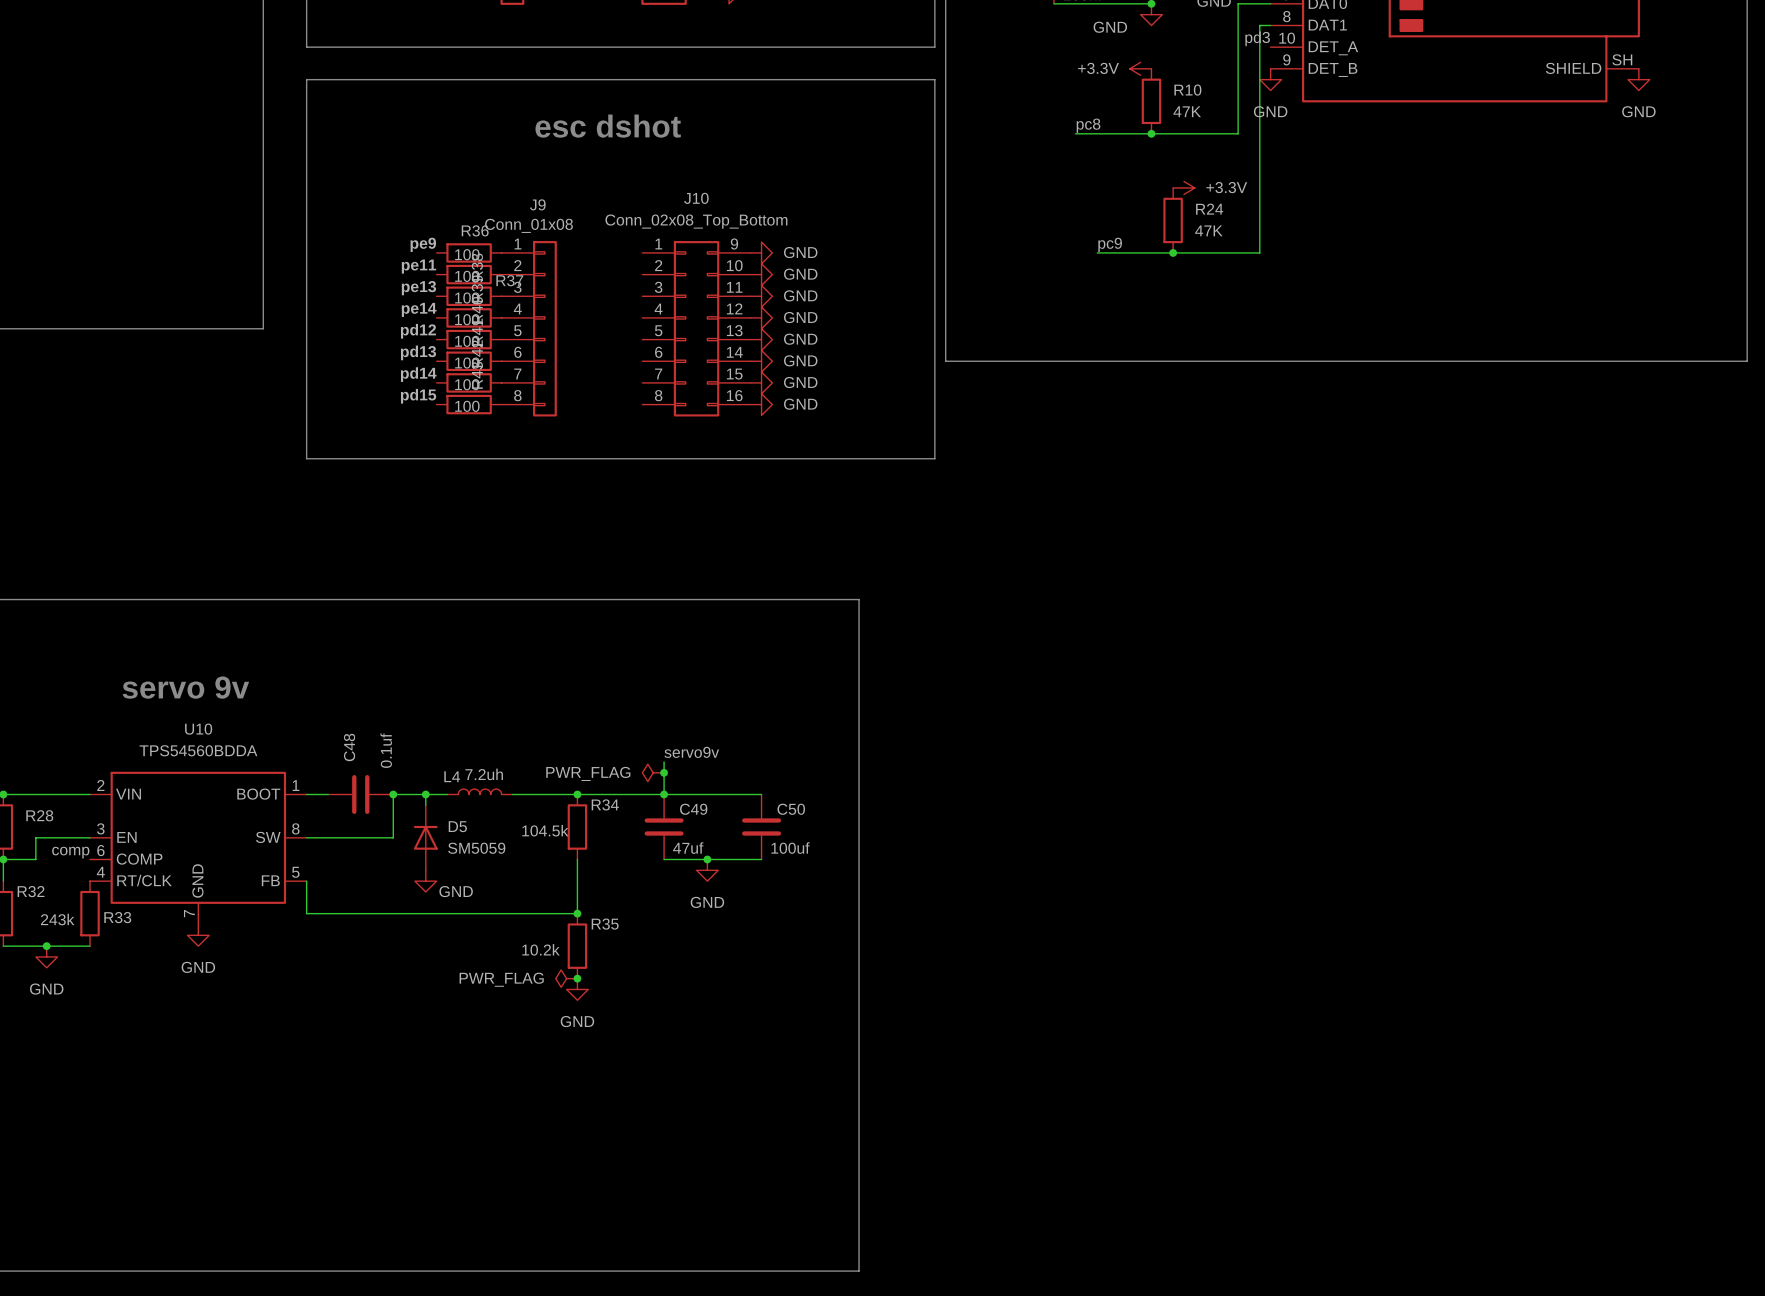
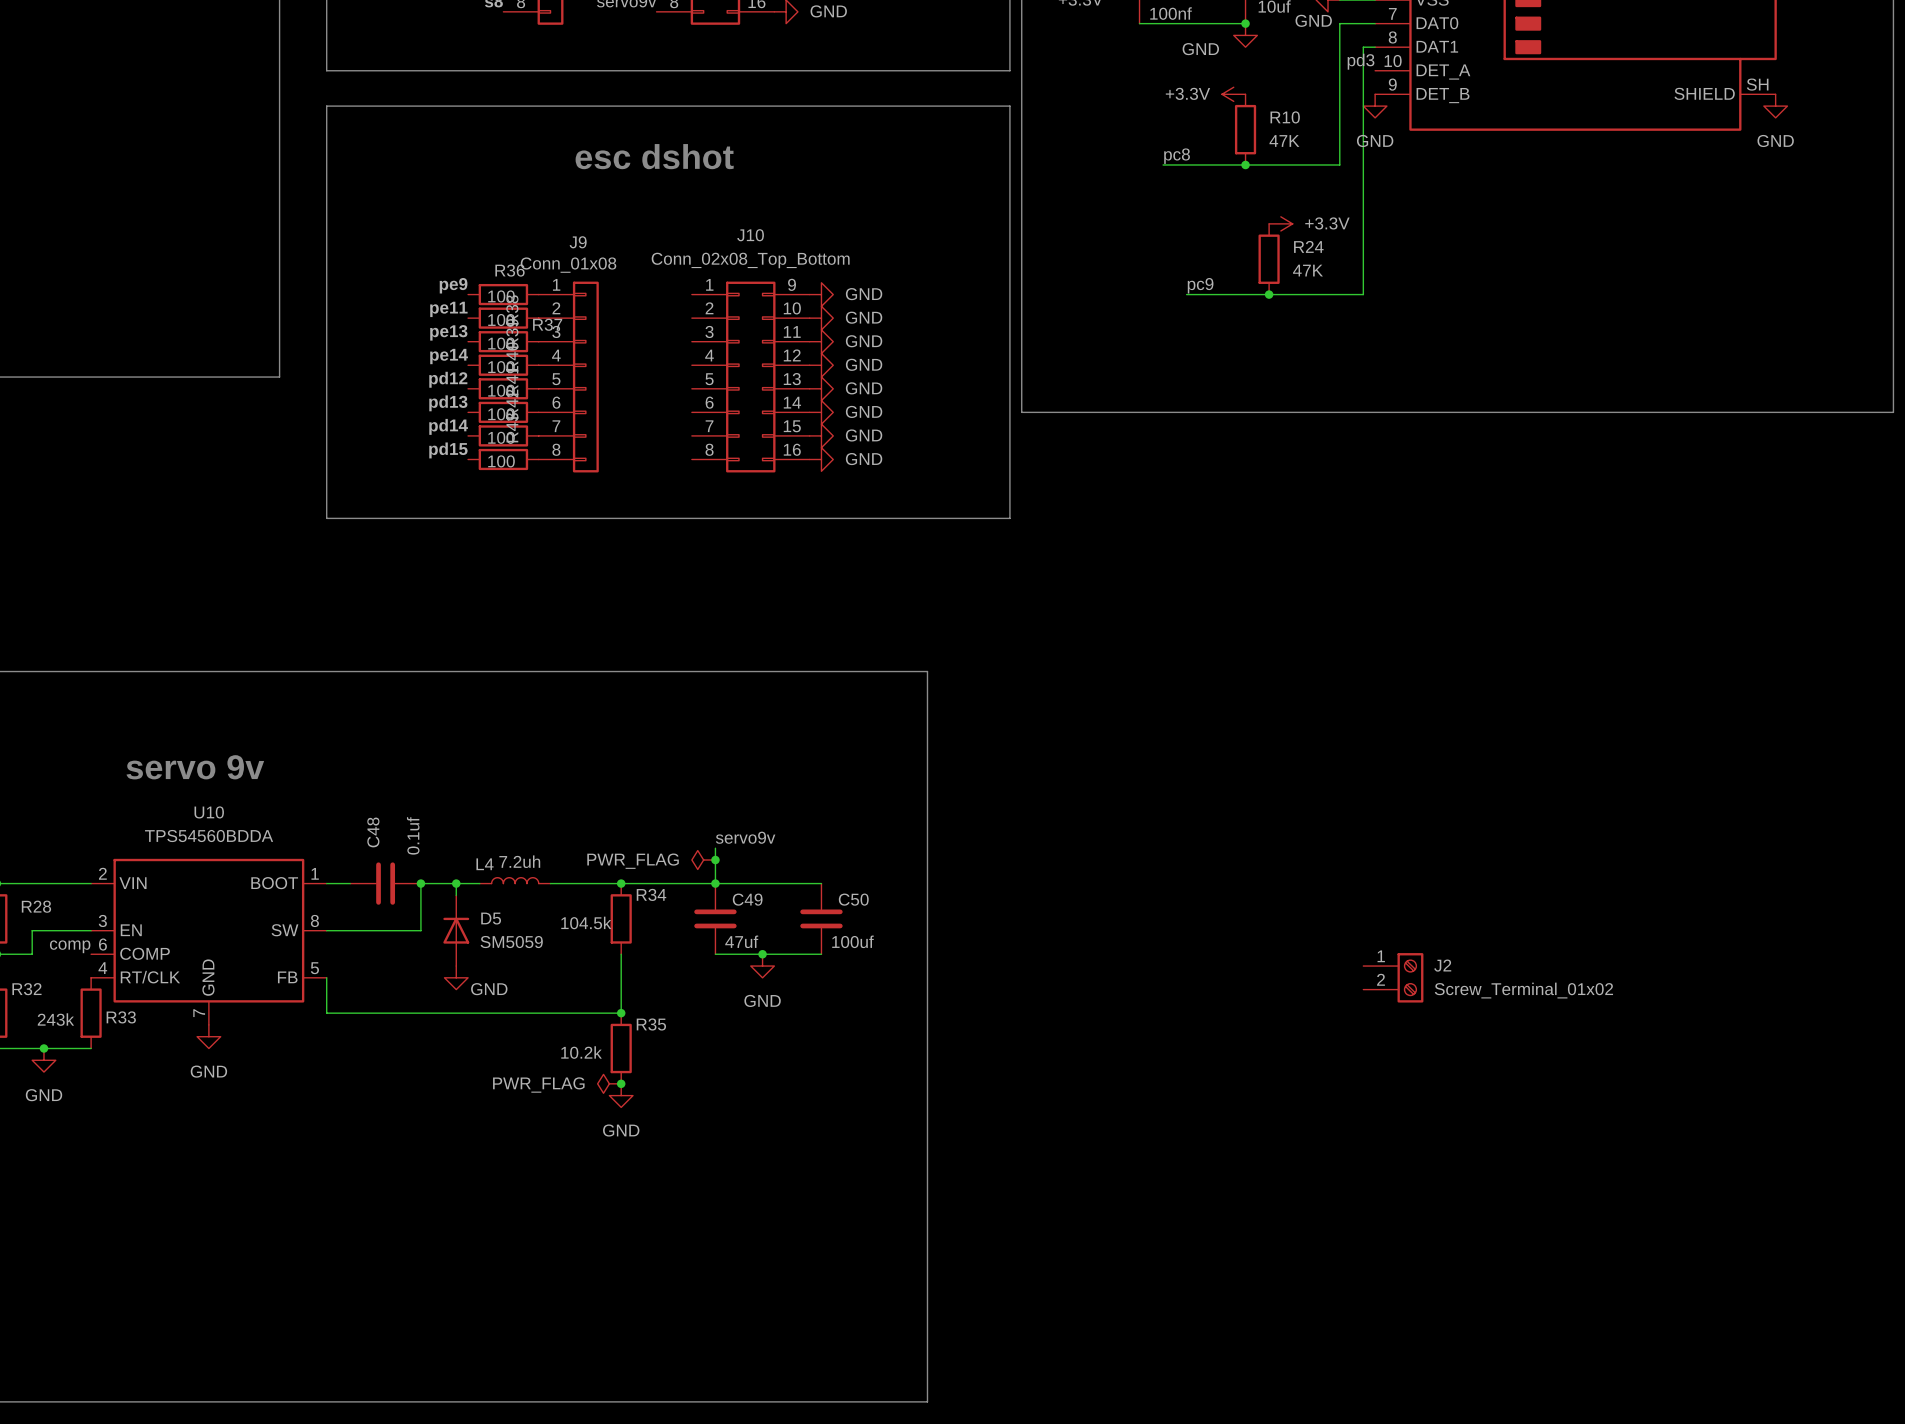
J2: none -> Screw_Terminal_01x02 (1393, 977)

